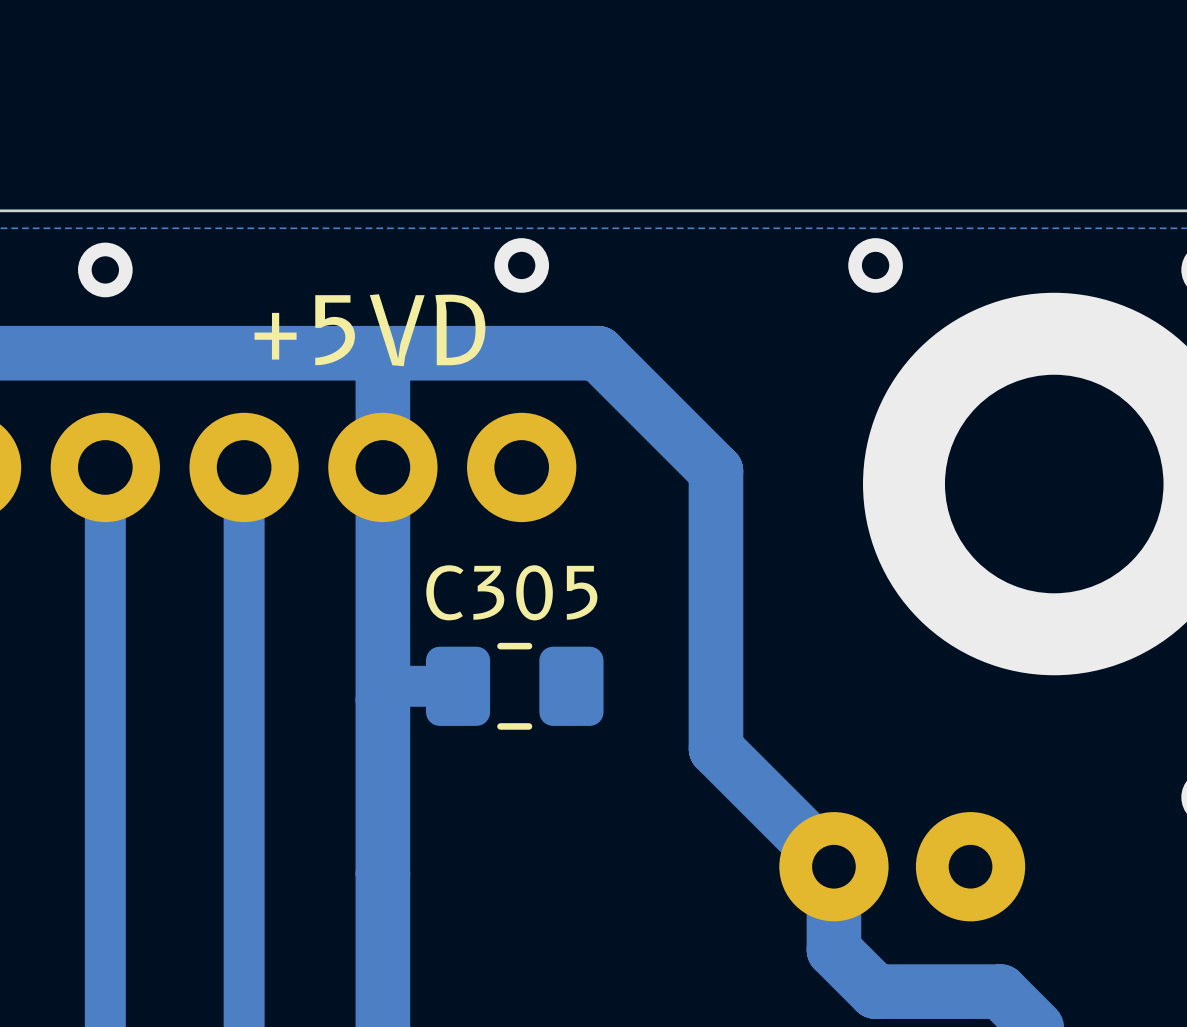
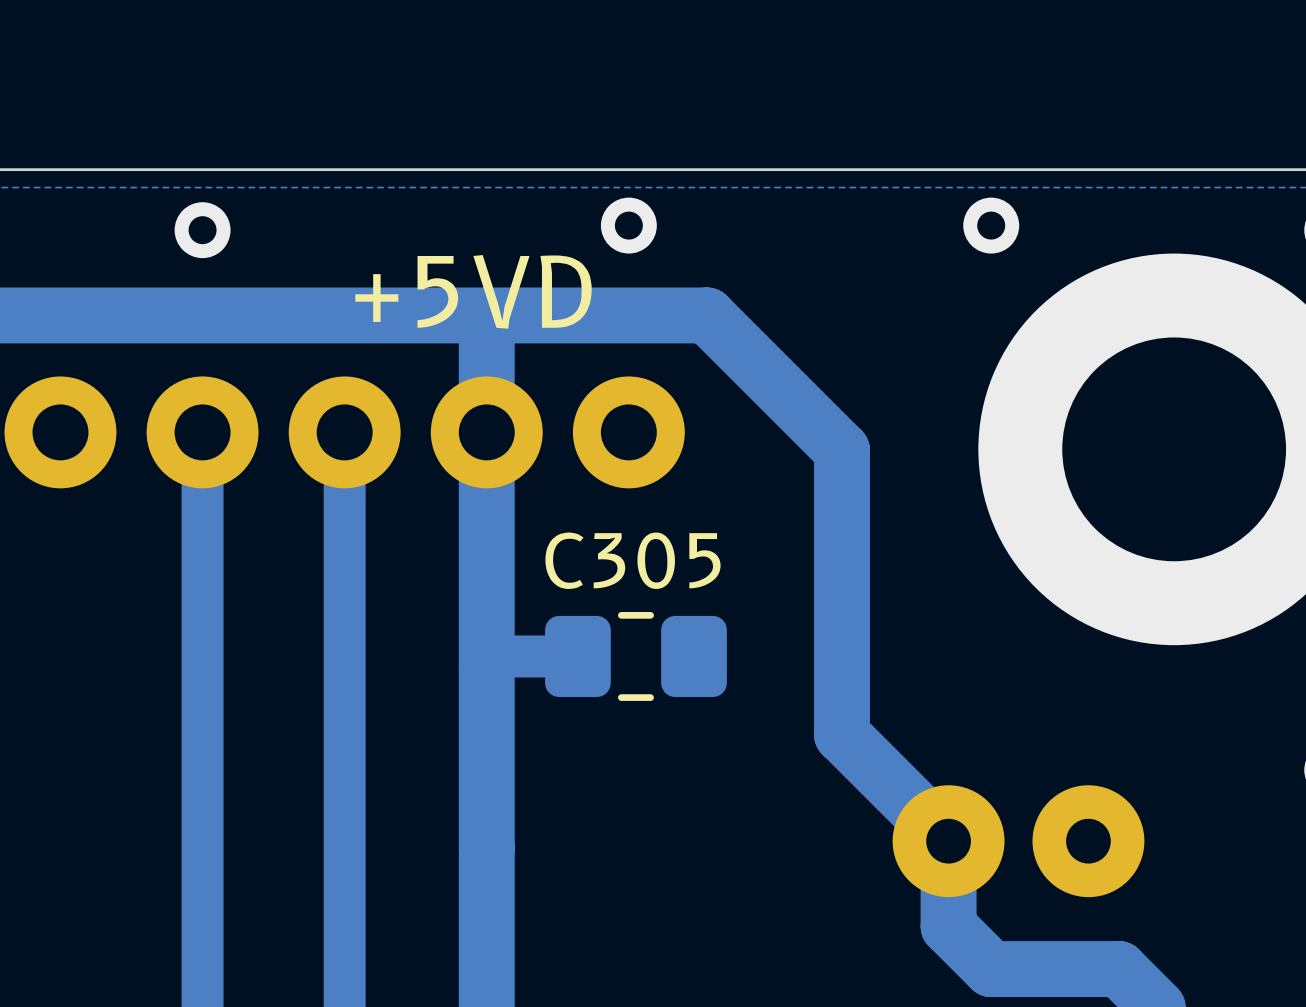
track: (715, 471) (715, 748) (729, 762) -> (827, 436) (842, 450) (842, 734)
C305 position: (514, 686) -> (635, 656)

